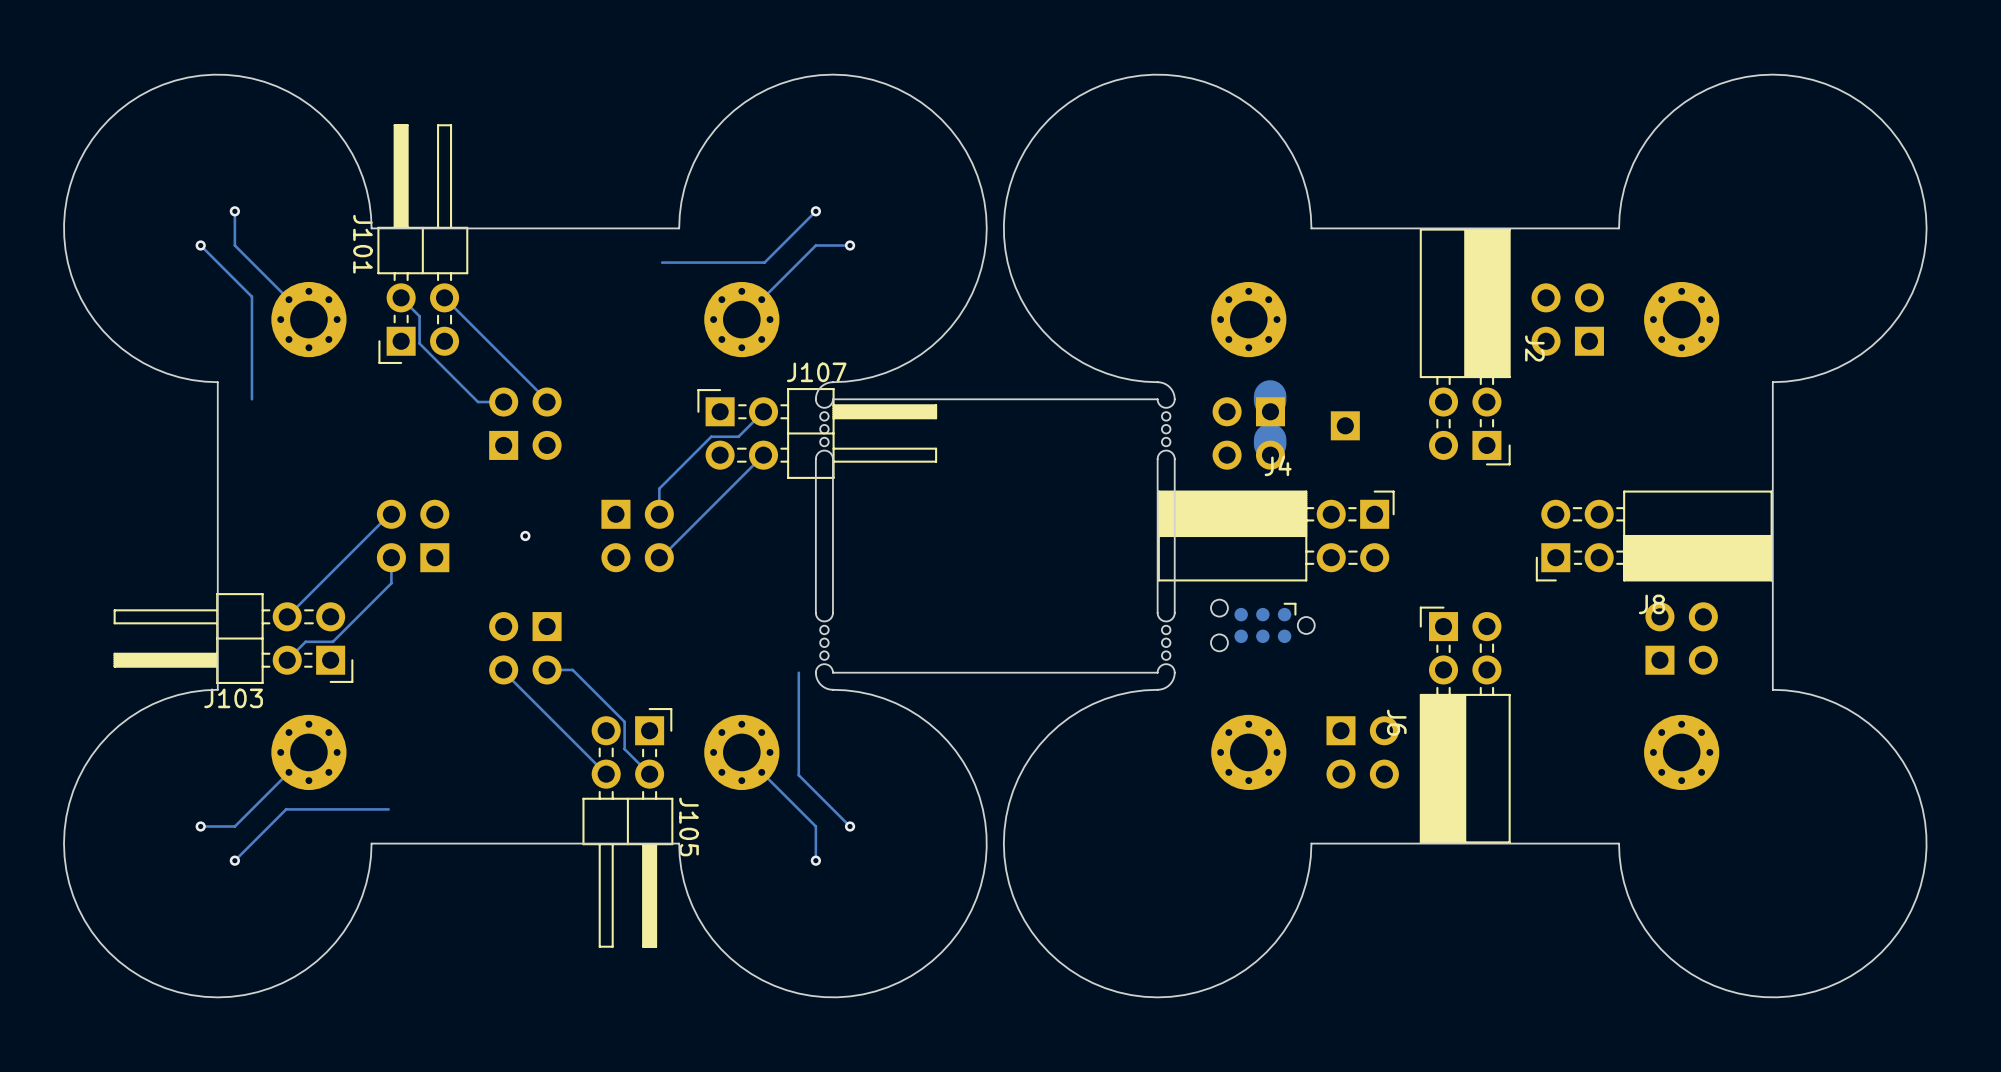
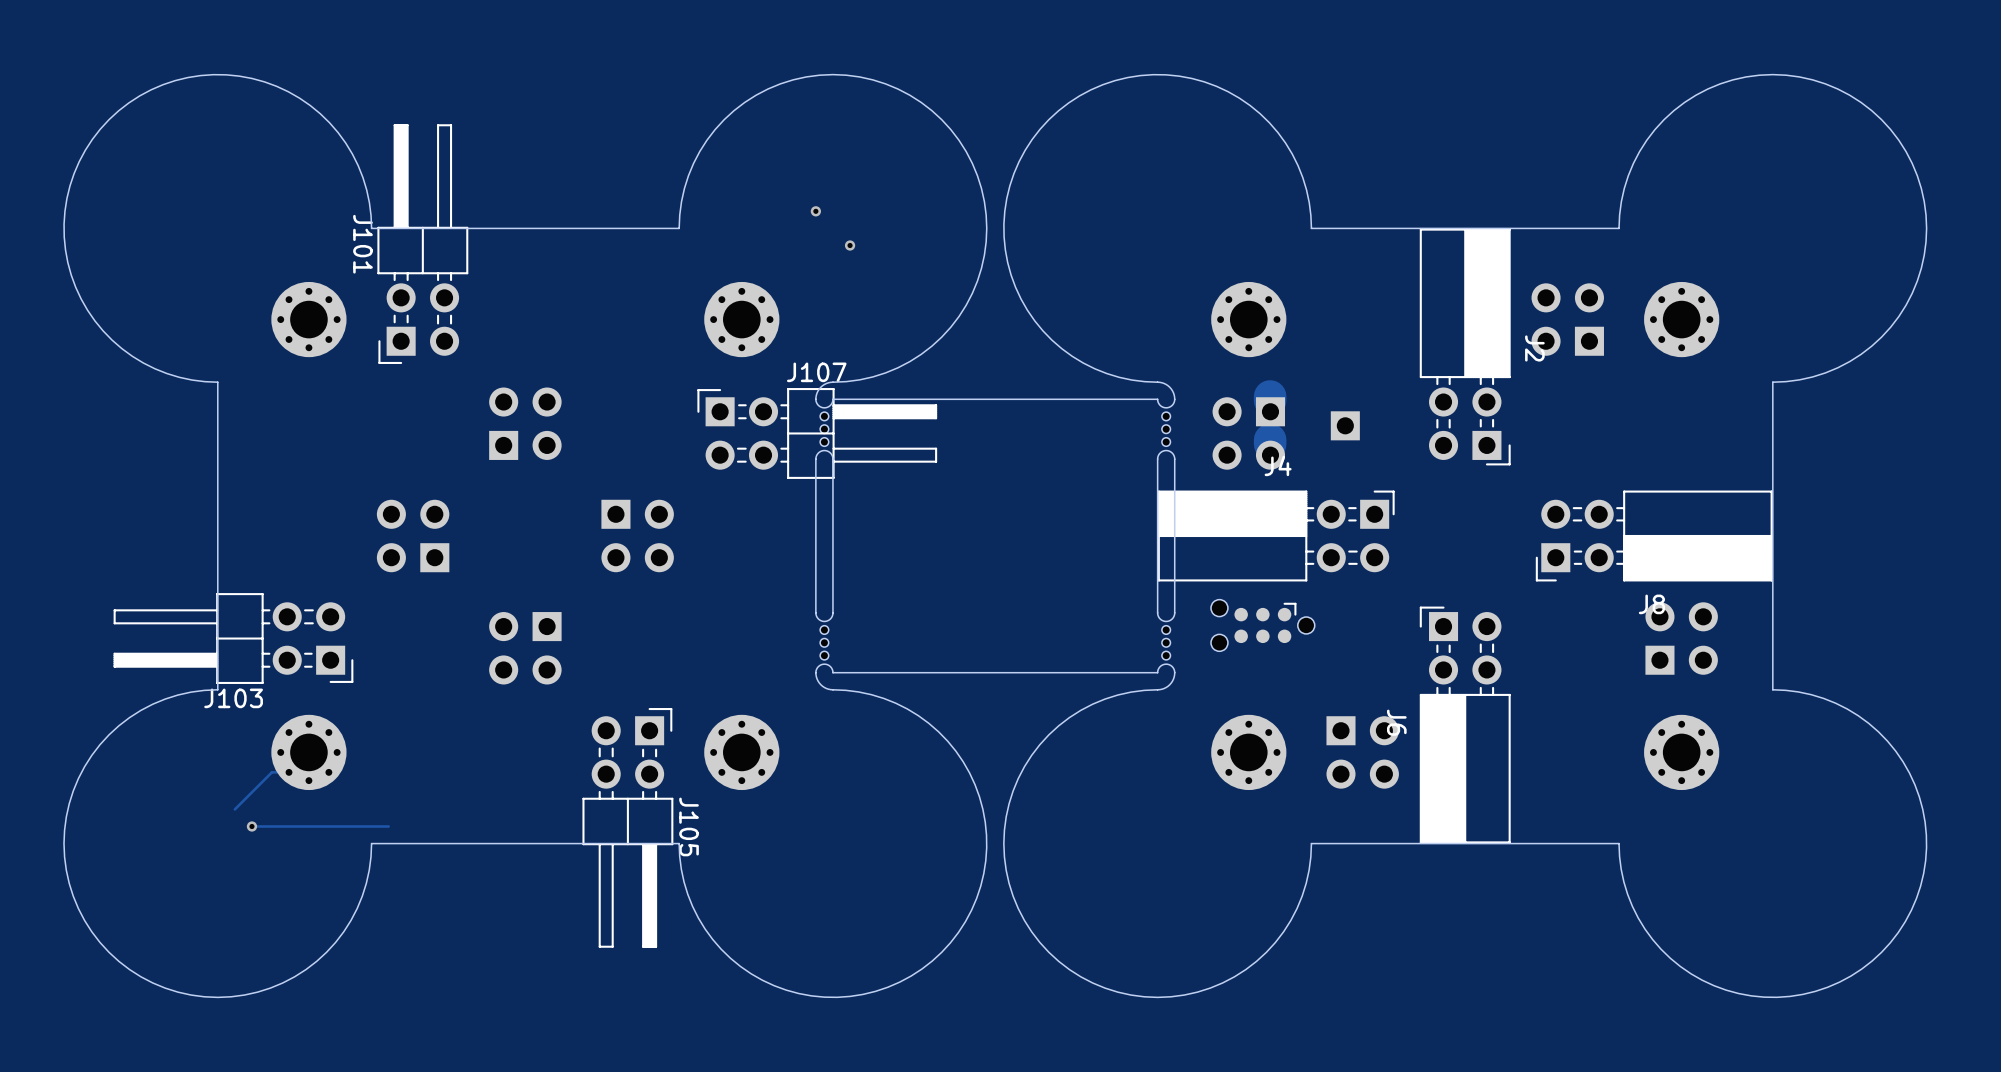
track: (234, 211) (234, 245) (308, 319) -> none
via: (234, 211) -> none
track: (815, 211) (764, 262) (662, 262) -> none
track: (200, 245) (251, 296) (251, 399) -> none
via: (200, 245) -> none
track: (850, 245) (815, 245) (761, 299) -> none
track: (401, 297) (419, 316) (419, 343) (478, 402) (503, 402) -> none
track: (444, 297) (547, 402) -> none
track: (763, 411) (738, 436) (711, 436) (659, 488) (659, 514) -> none
track: (763, 455) (659, 557) -> none
track: (391, 514) (287, 616) -> none
via: (525, 536) -> none
track: (391, 557) (391, 583) (332, 641) (305, 641) (287, 660) -> none
track: (503, 669) (606, 774) -> none
track: (547, 669) (572, 669) (624, 721) (624, 749) (649, 774) -> none
track: (798, 672) (798, 775) (850, 826) -> none
track: (308, 752) (234, 826) (200, 826) -> none
track: (741, 752) (815, 826) (815, 860) -> none
track: none -> (289, 772) (271, 772) (234, 809)
track: (388, 809) (286, 809) (234, 860) -> none
via: (200, 826) -> none
via: none -> (251, 826)
track: none -> (388, 826) (251, 826)
via: (850, 826) -> none
via: (234, 860) -> none
via: (815, 860) -> none

